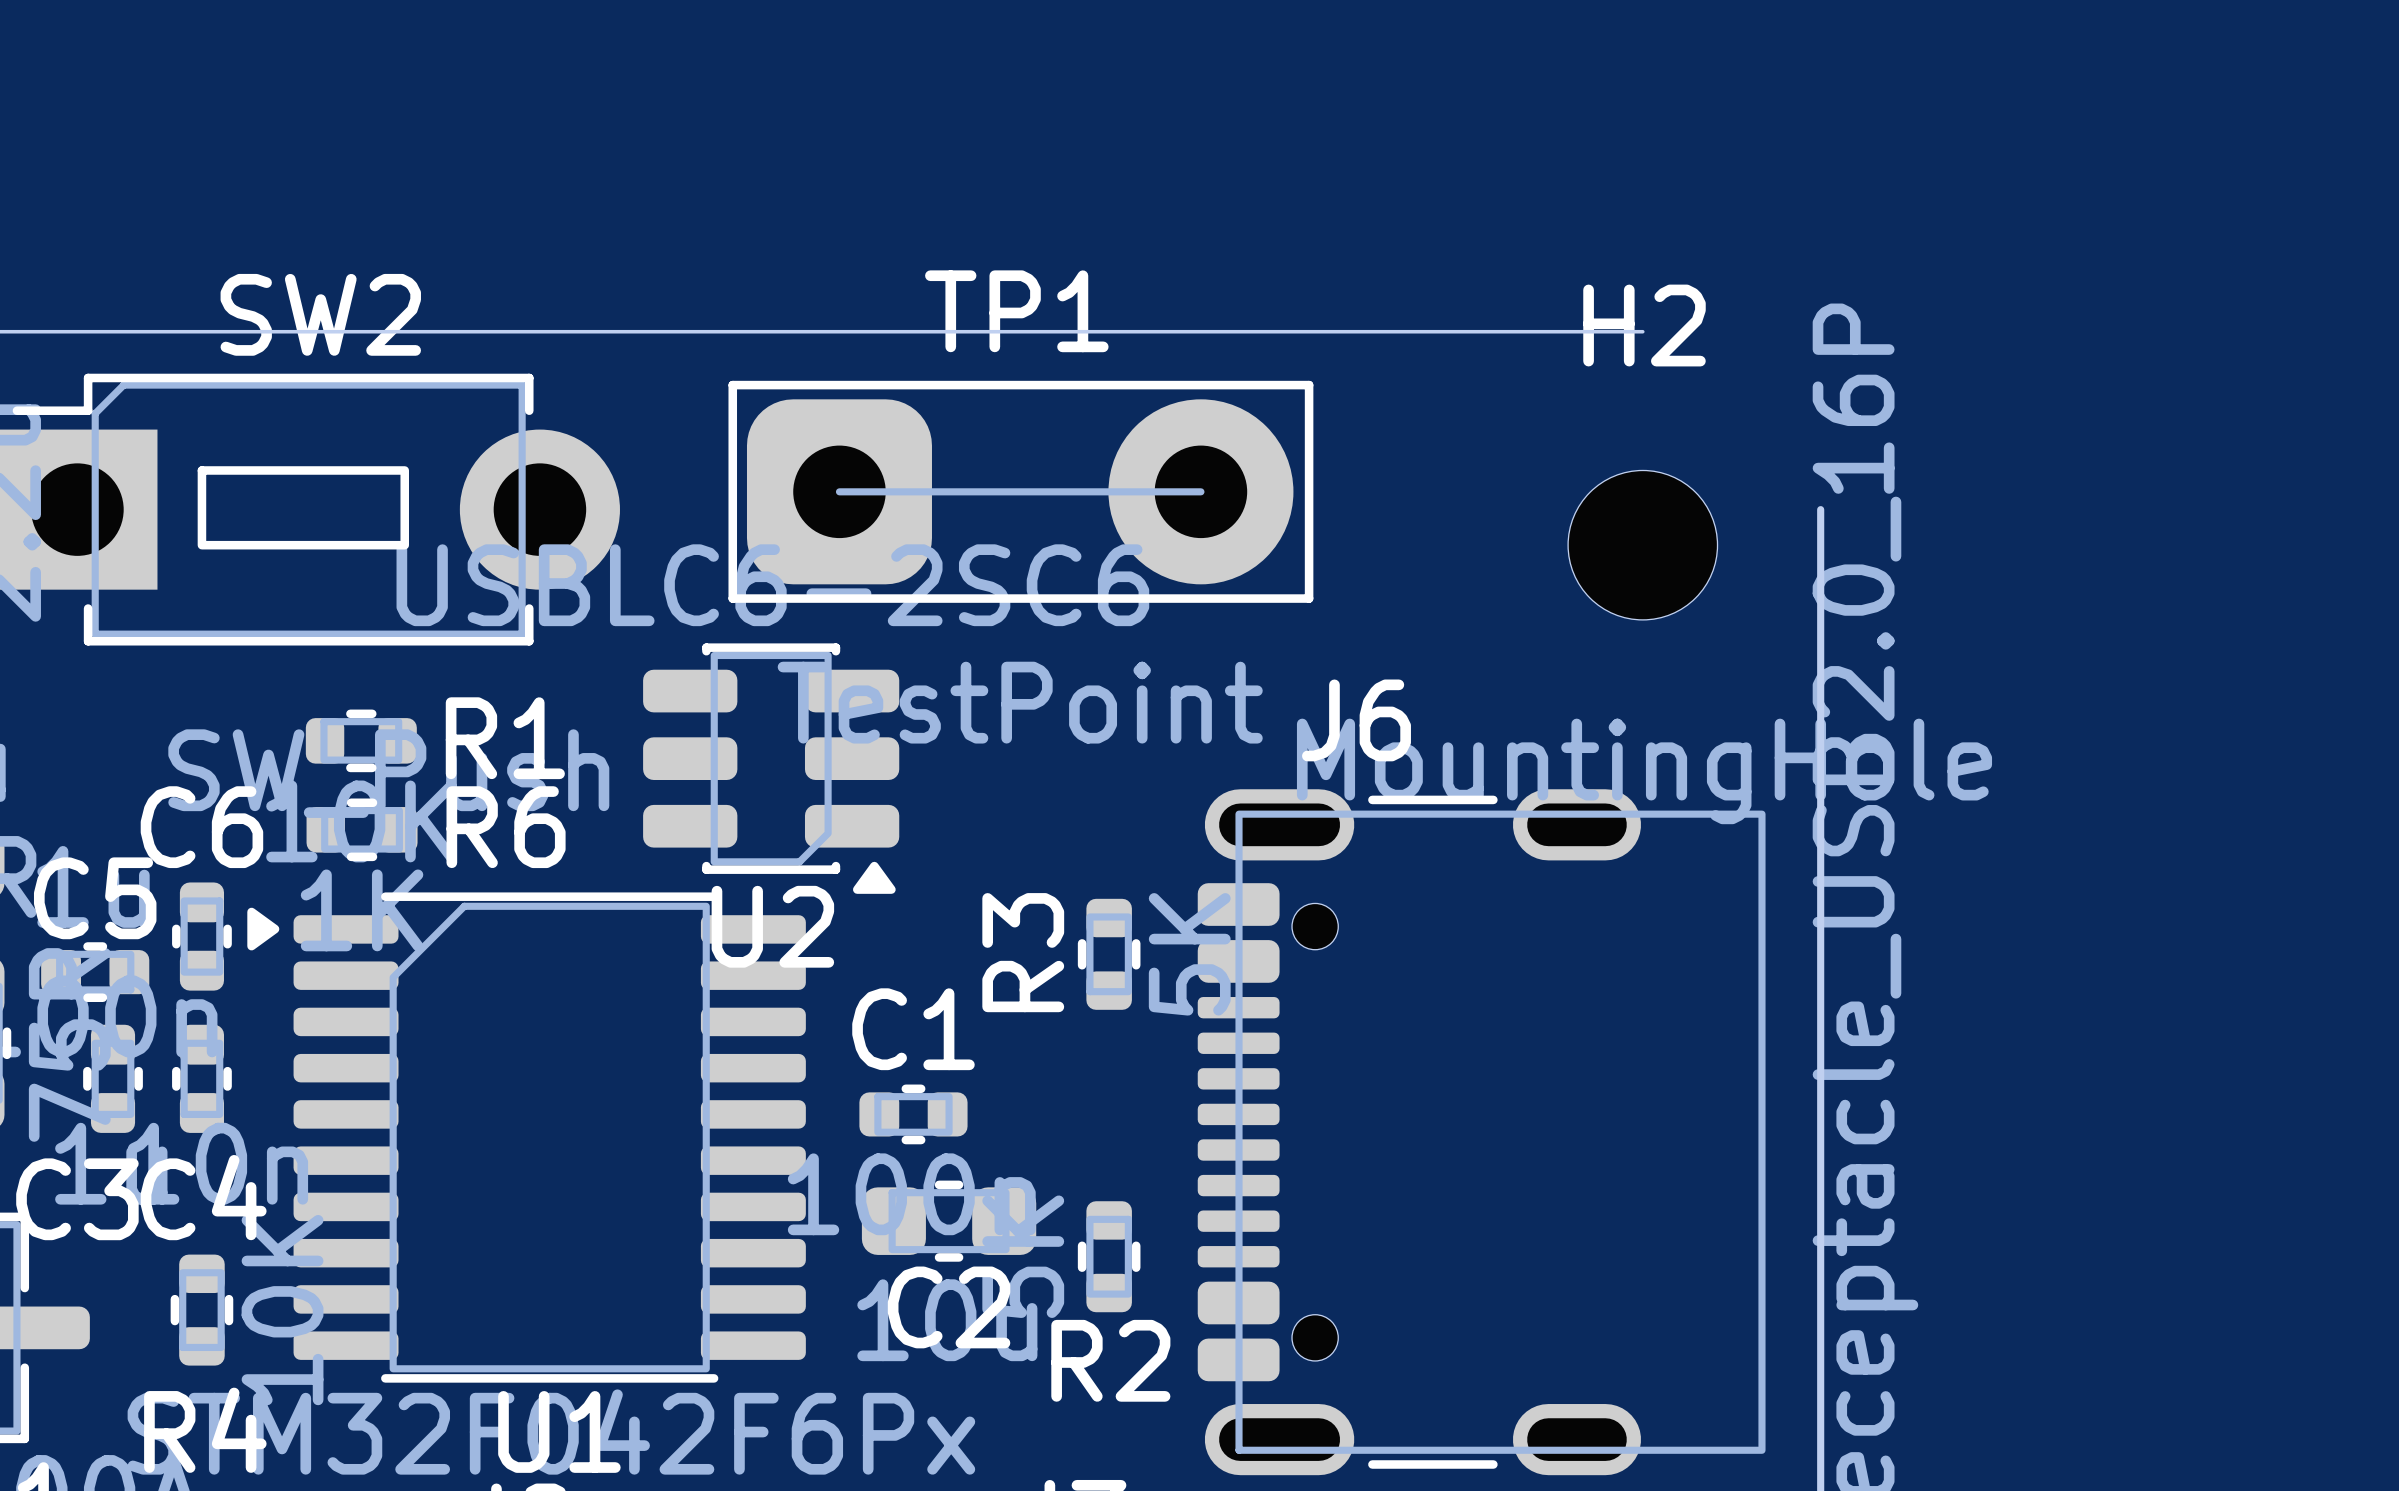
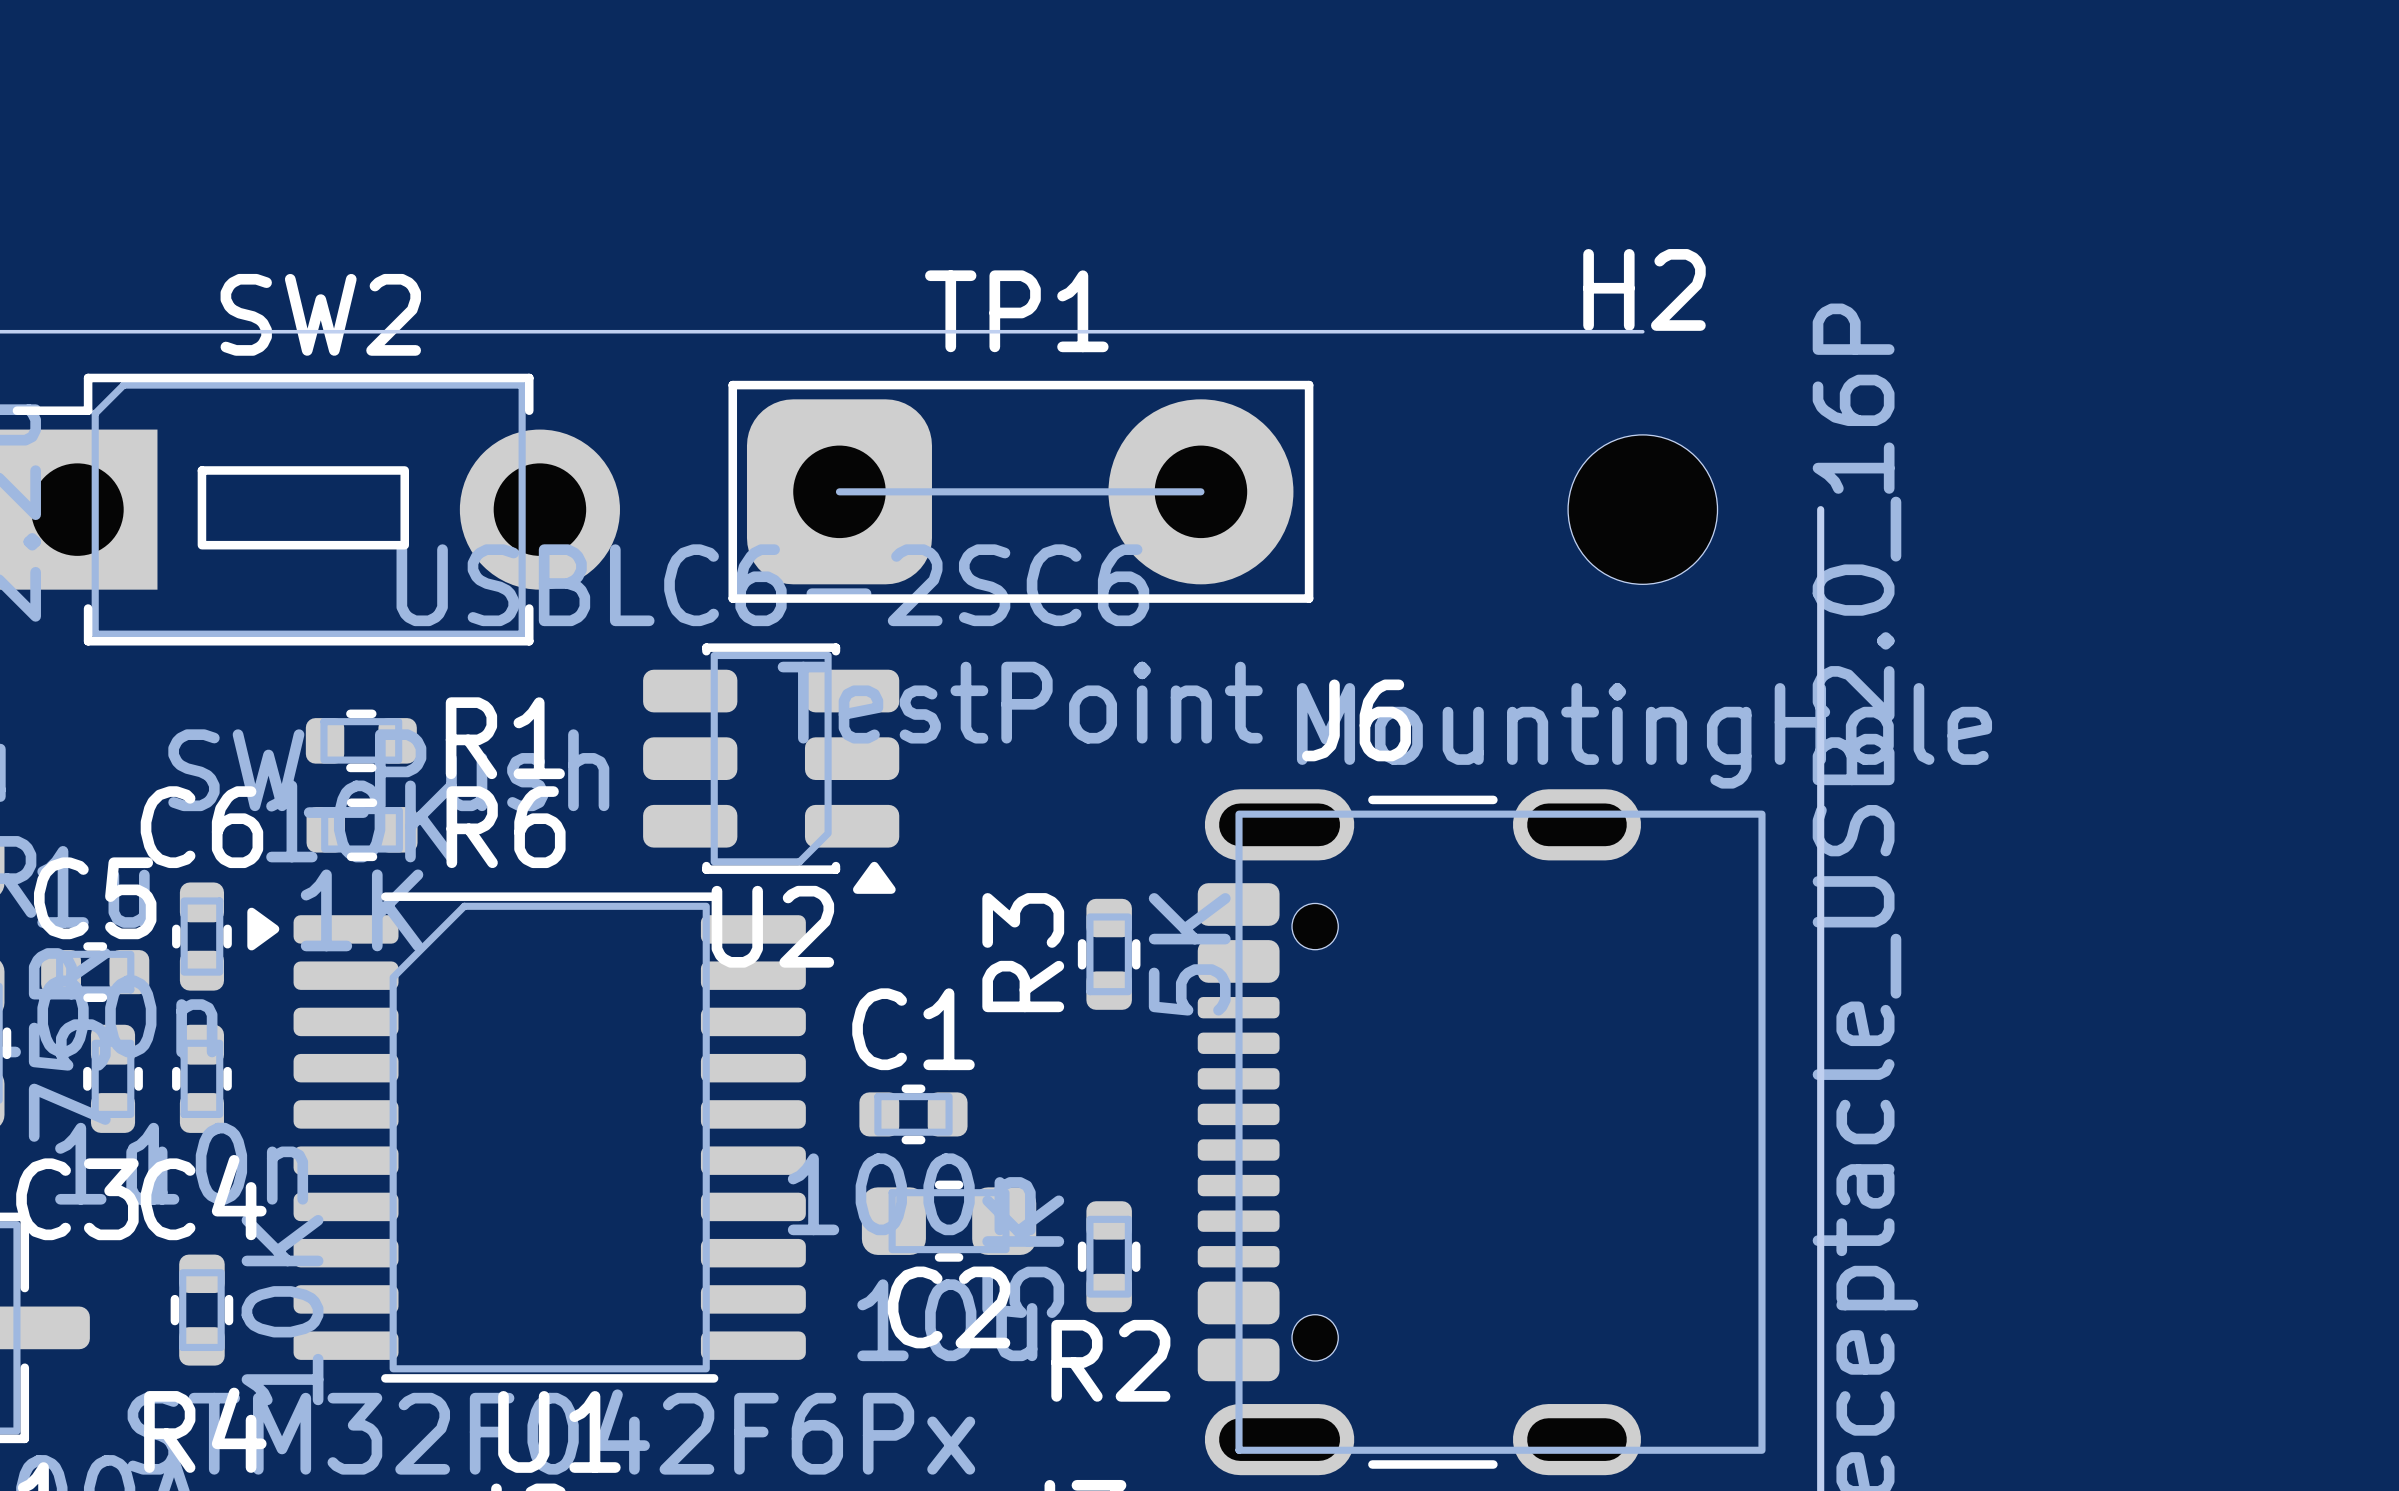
H2 position: (1642, 545) -> (1642, 509)

